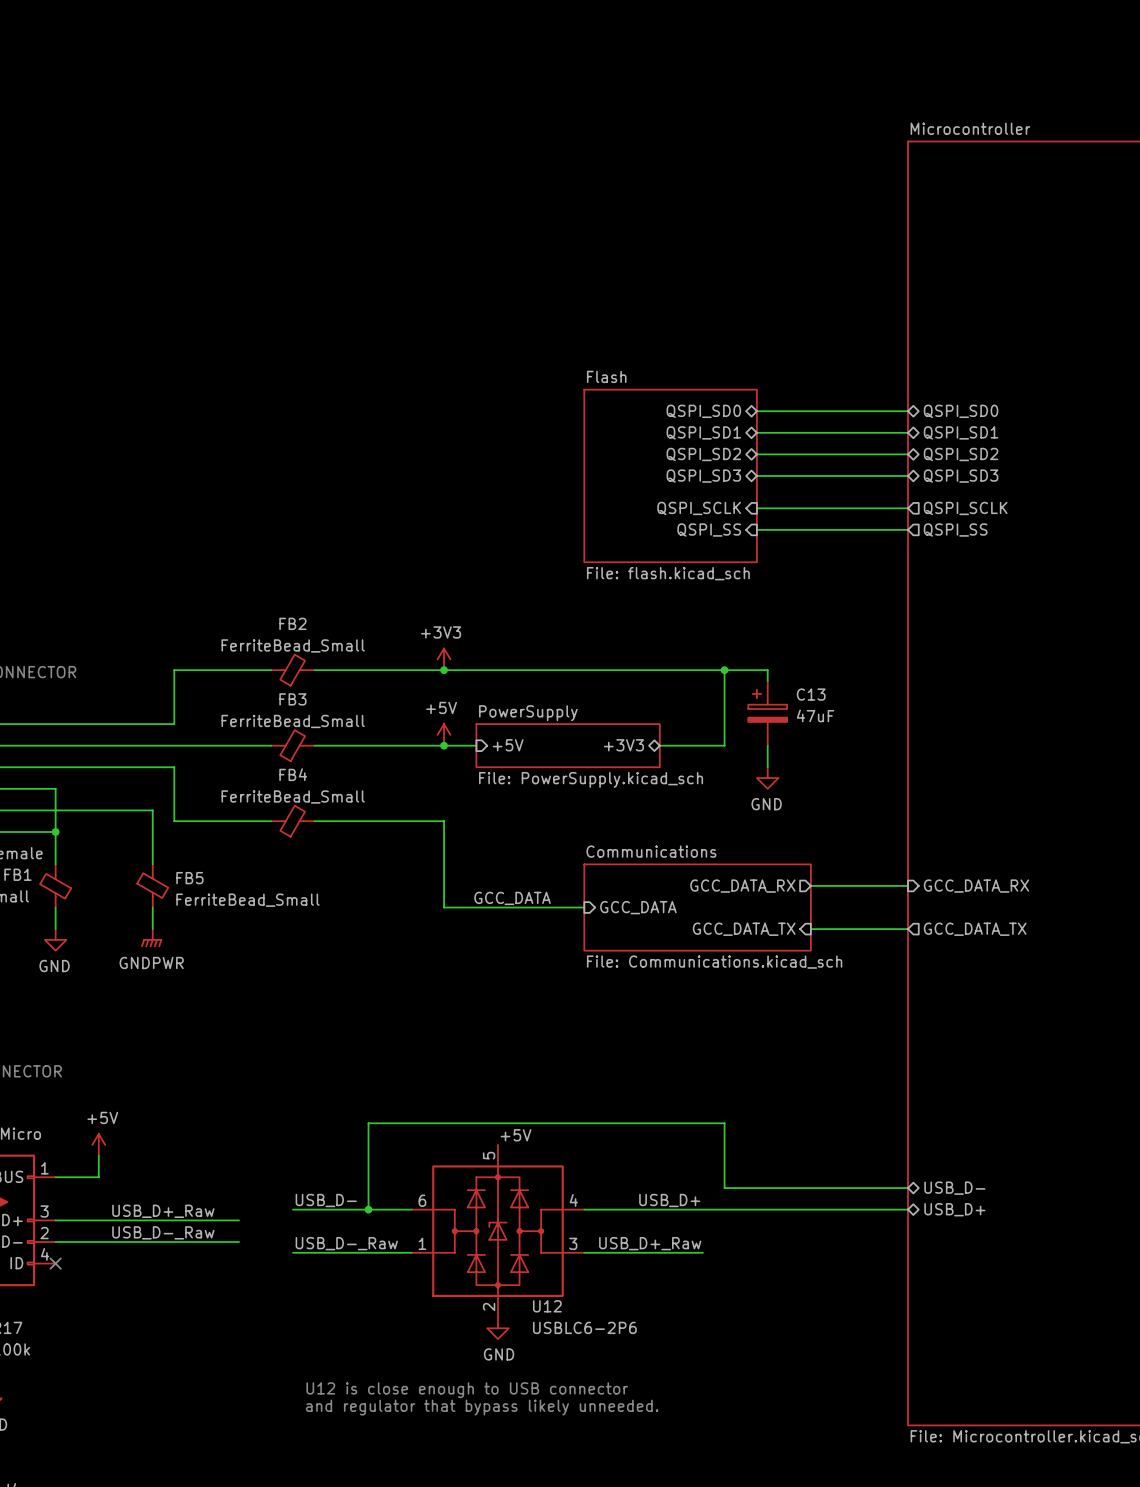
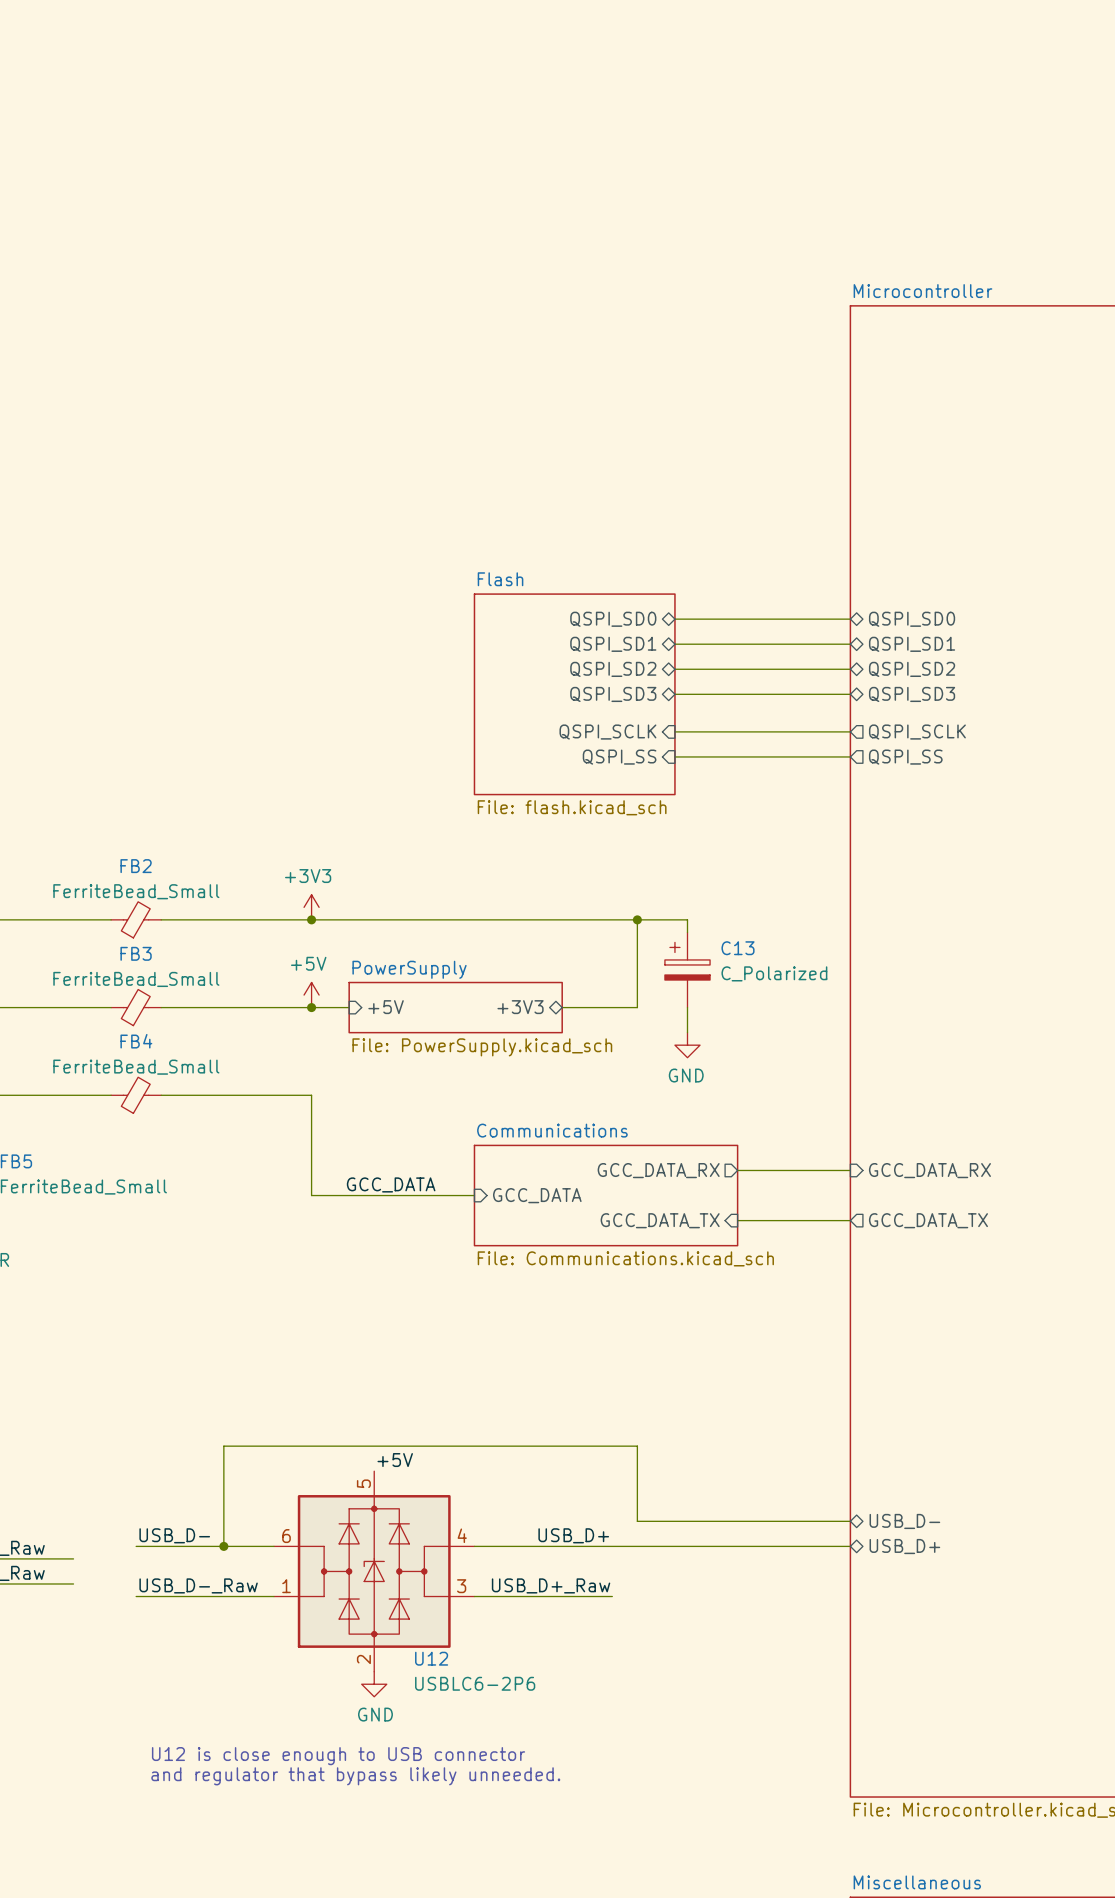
C13 value: 47uF (815, 715) -> C_Polarized (774, 973)

